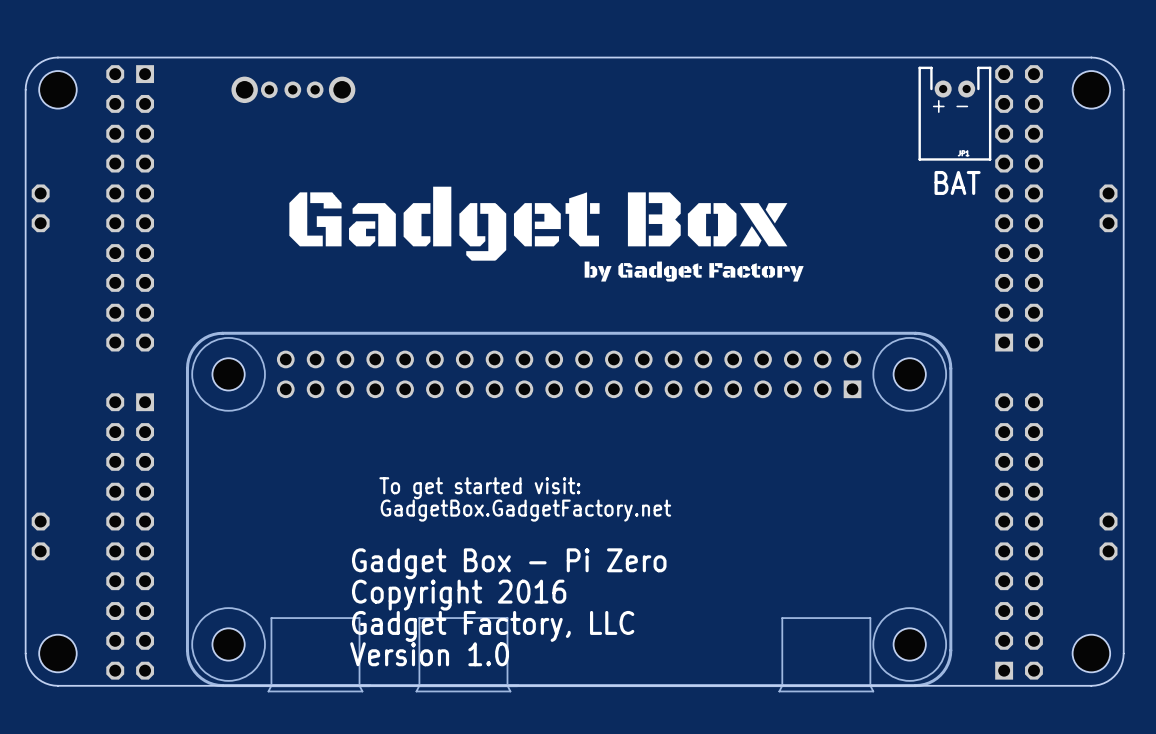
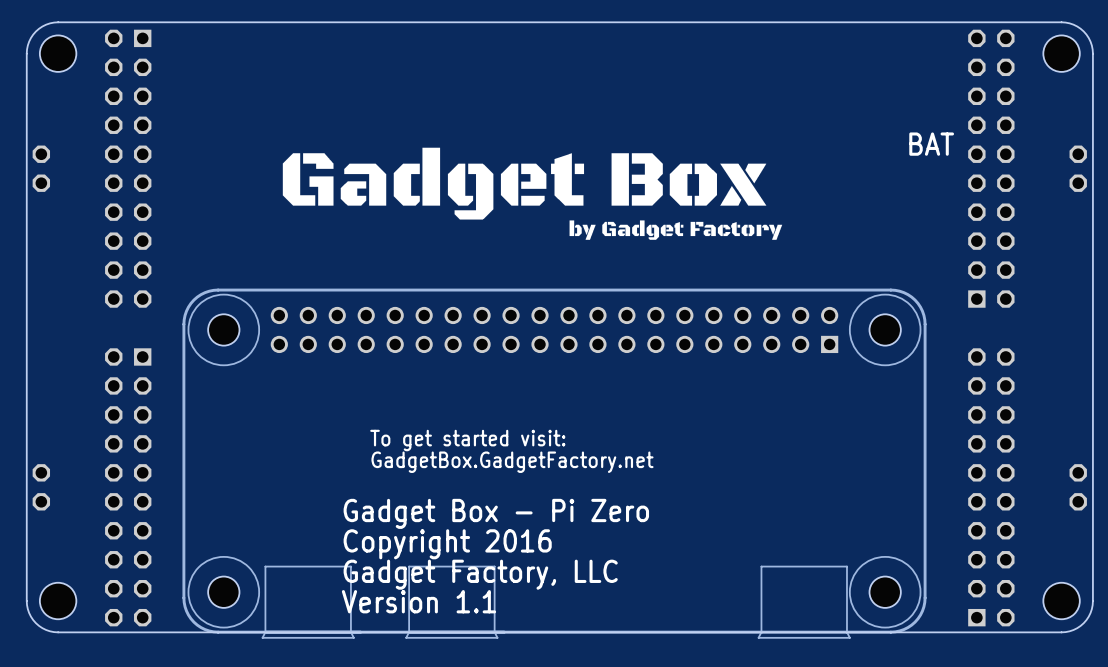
part: (293, 89) -> none
part: (954, 113) -> none
text: Version 1.0 (429, 654) -> Version 1.1 (418, 601)

